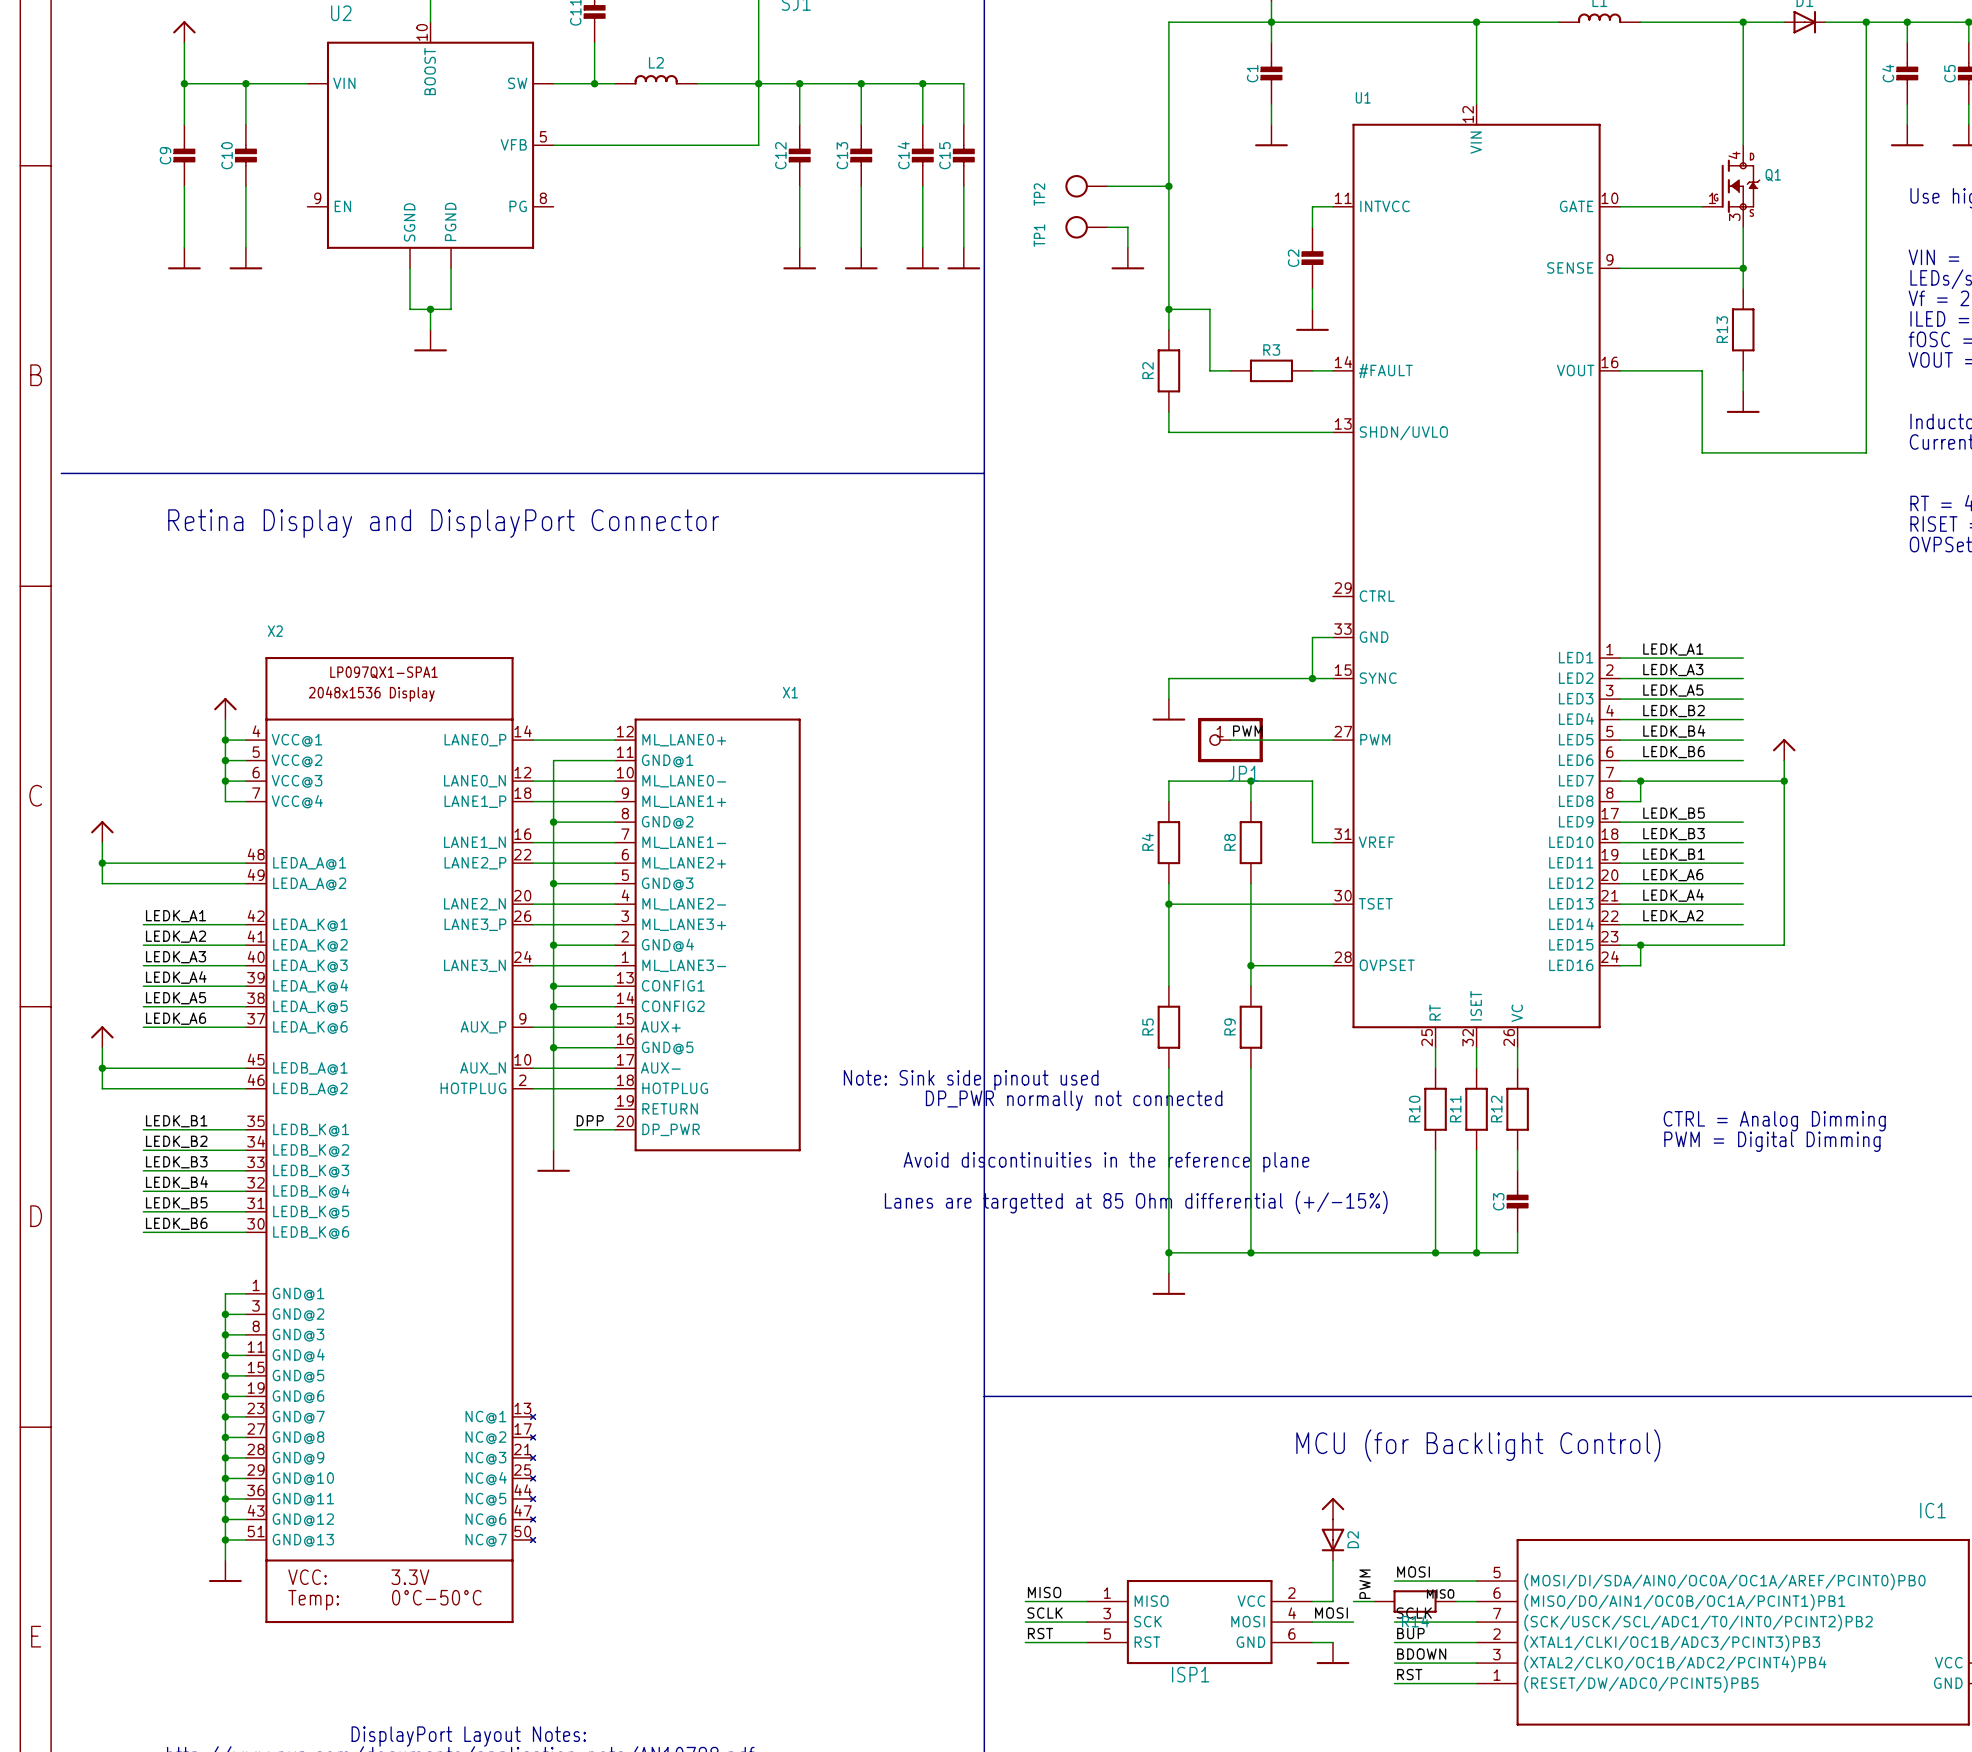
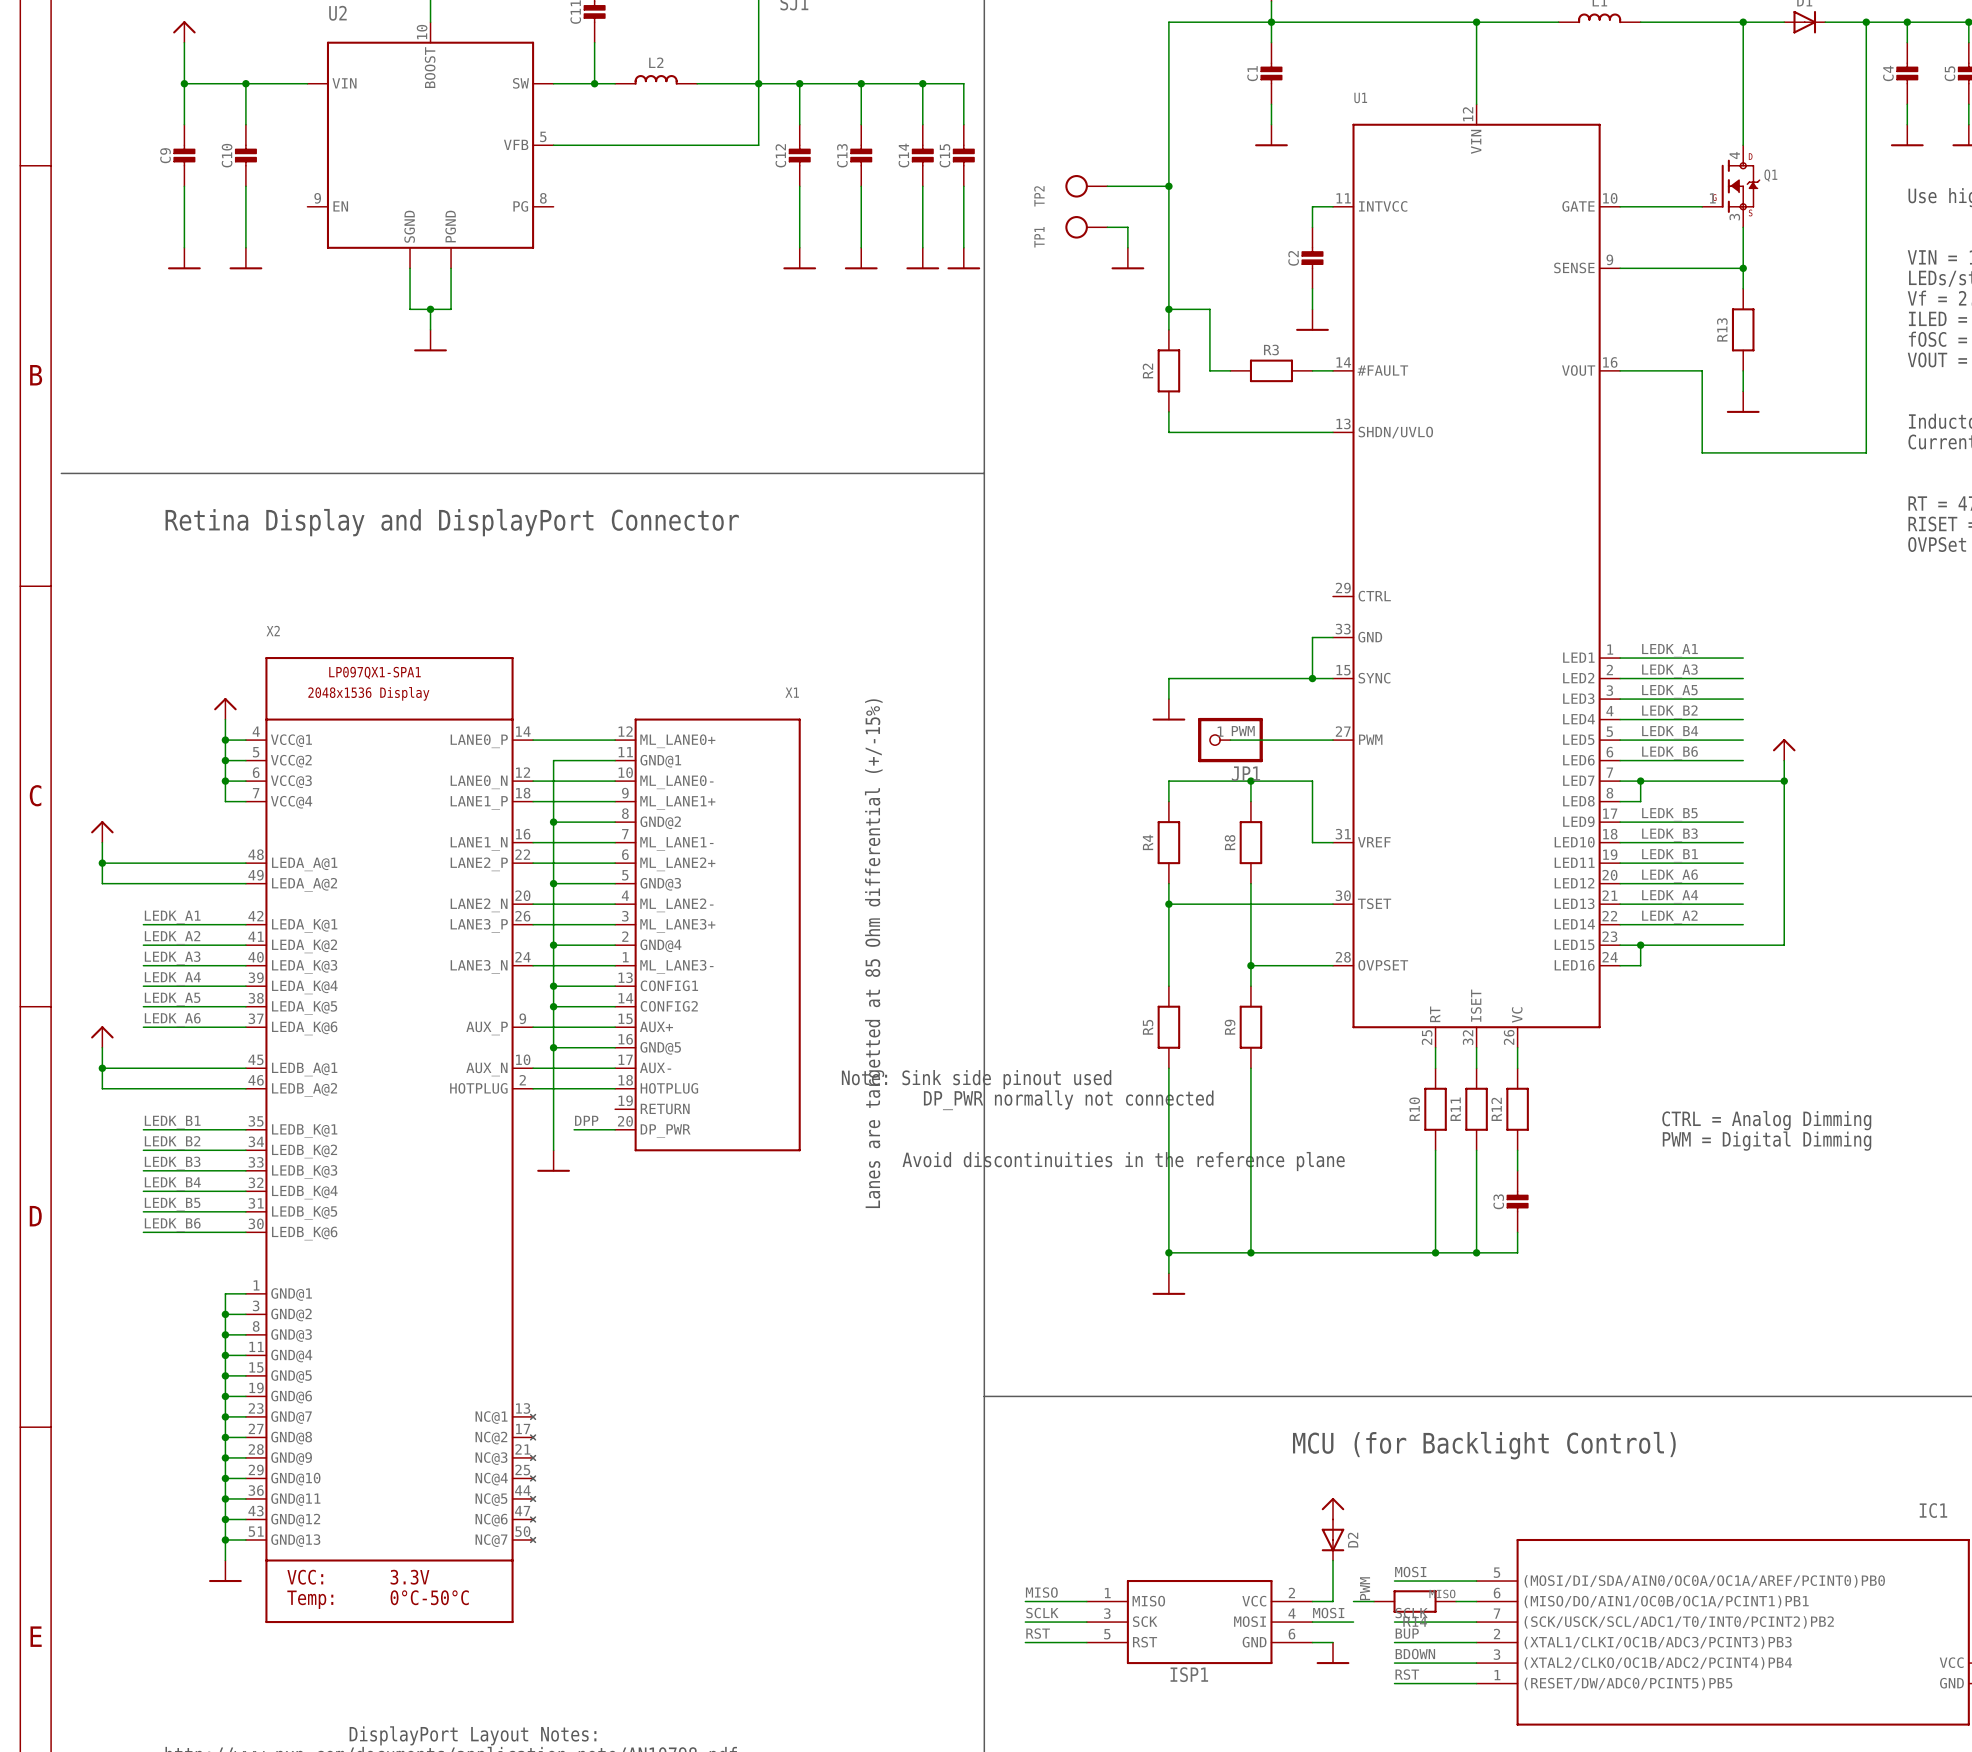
text rotation: 0° (1136, 1202) -> 90° counterclockwise (874, 953)

